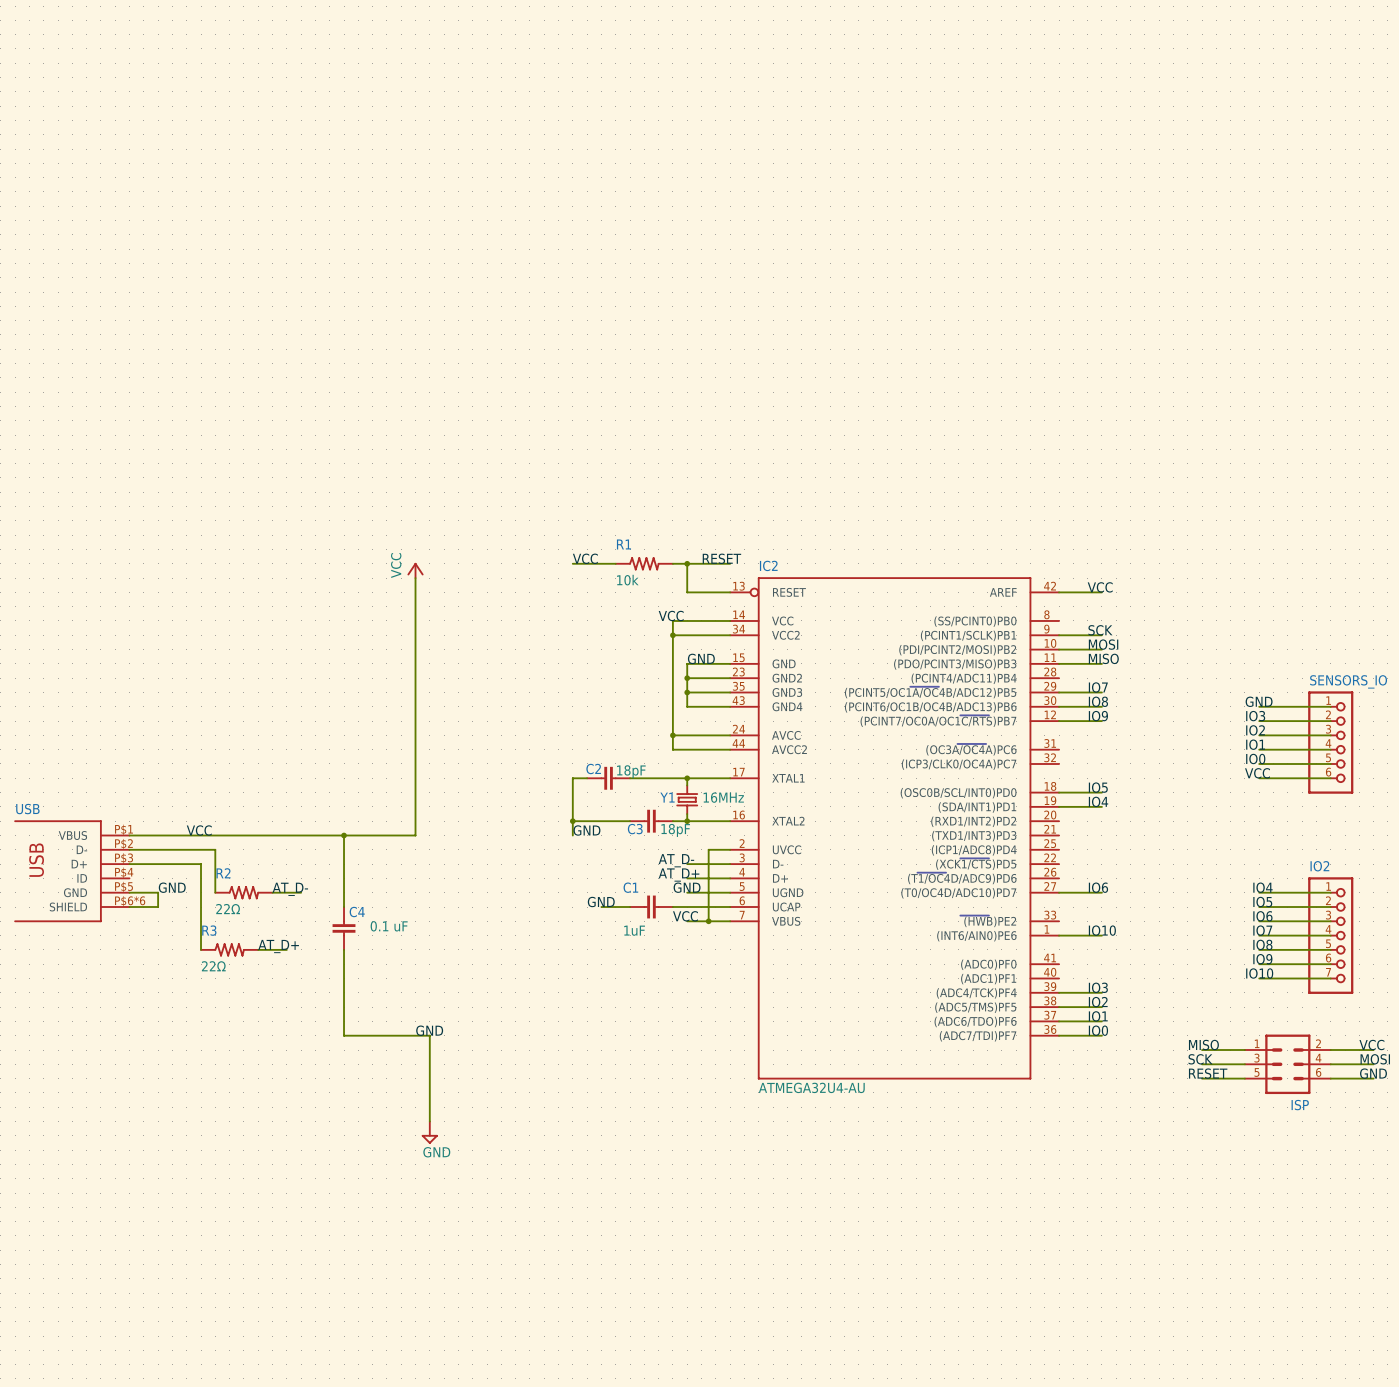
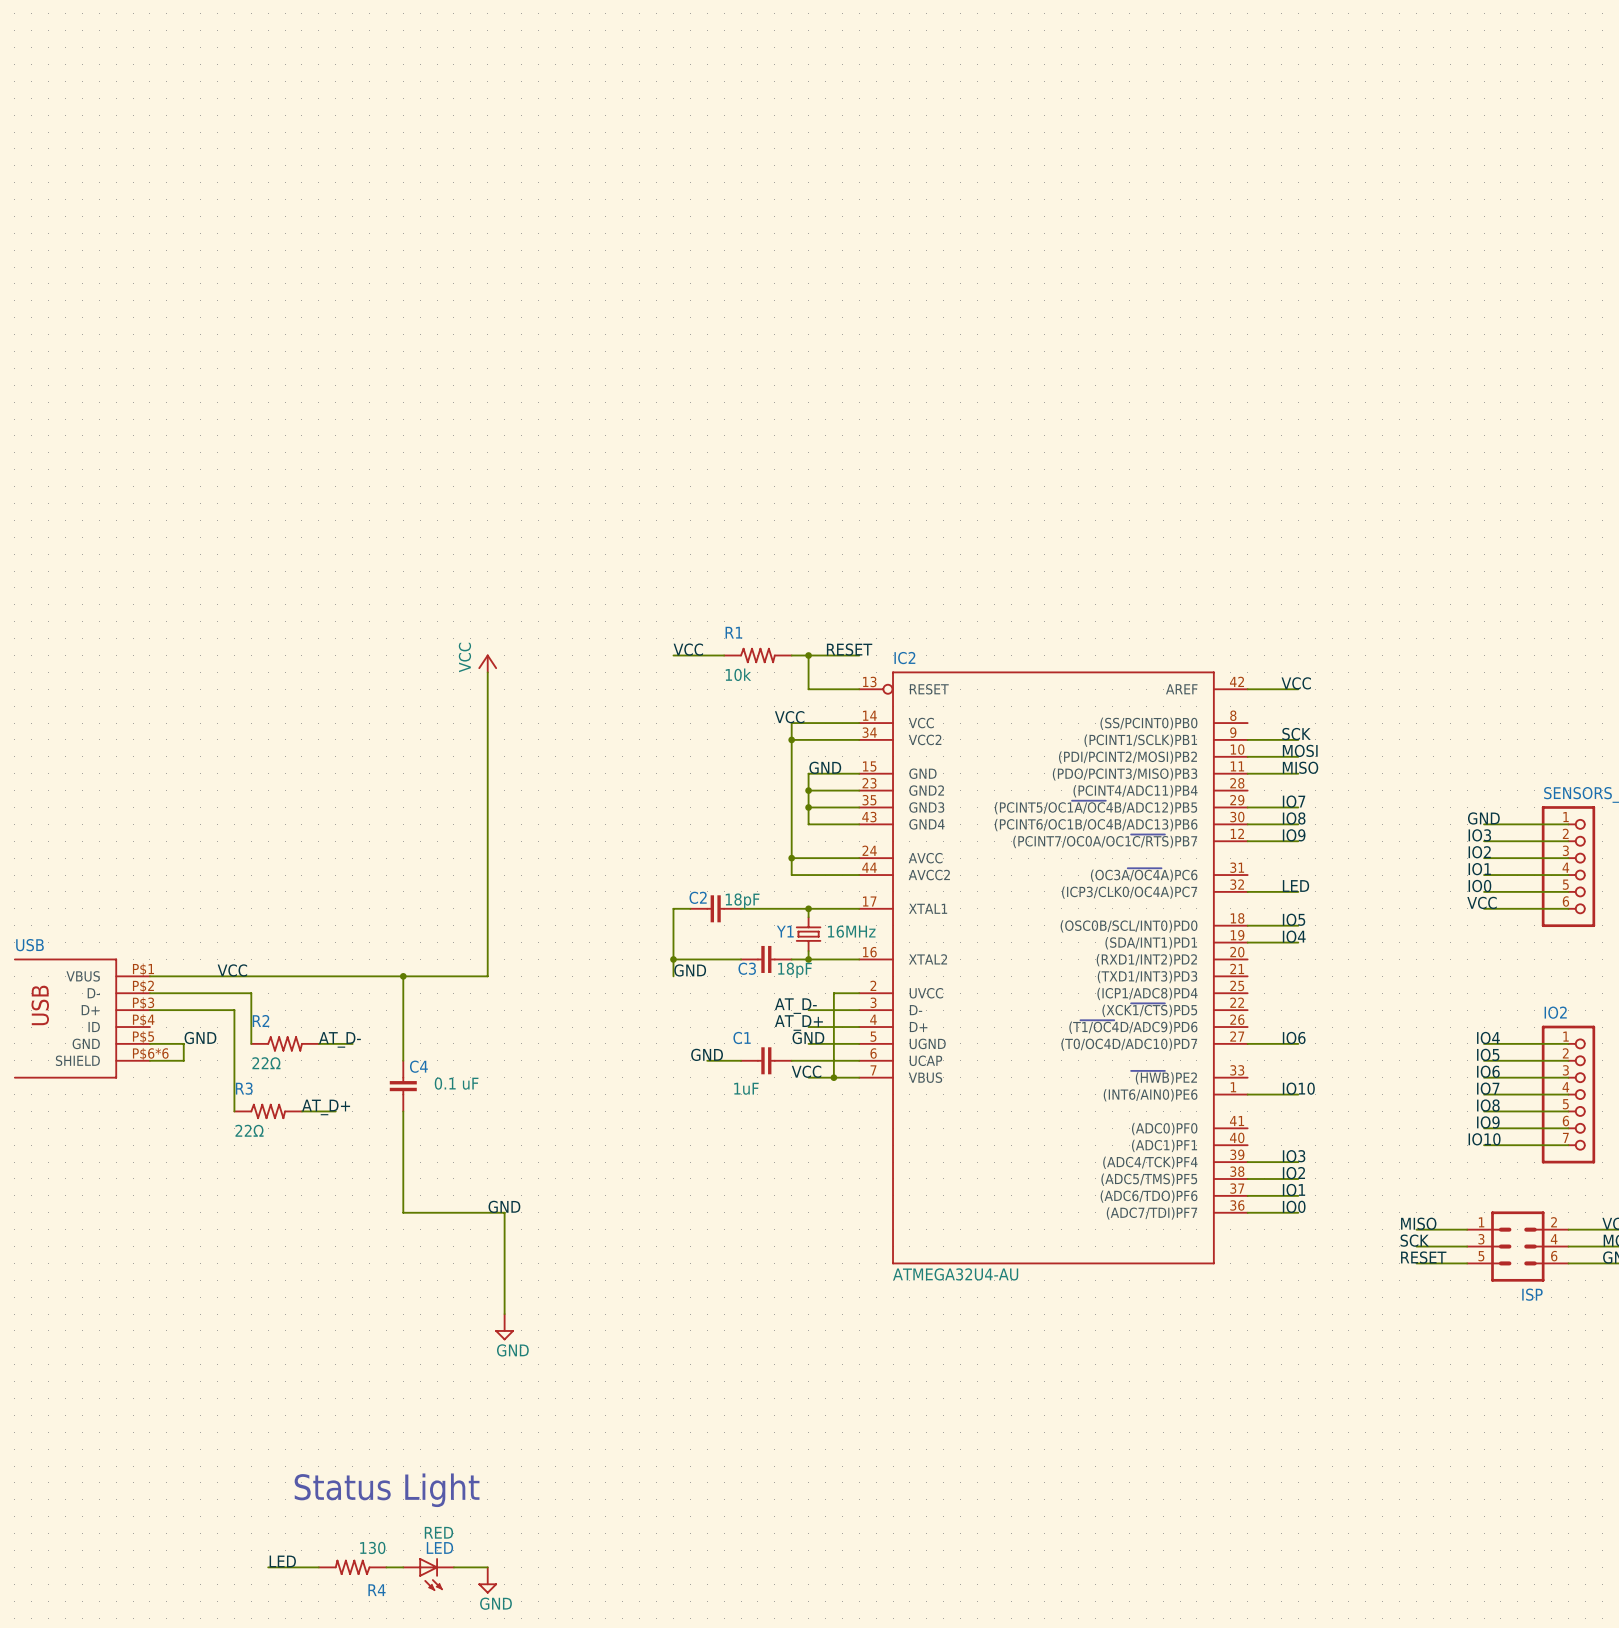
label: none -> LED (1295, 886)
wire: none -> (1247, 891) (1298, 891)
text: none -> Status Light (387, 1490)
label: none -> LED (282, 1561)
wire: none -> (268, 1567) (318, 1567)
R4: none -> 130 (352, 1567)
wire: none -> (386, 1567) (403, 1567)
wire: none -> (453, 1567) (487, 1567)
LED: none -> RED (428, 1574)
power symbol: none -> GND (487, 1580)

